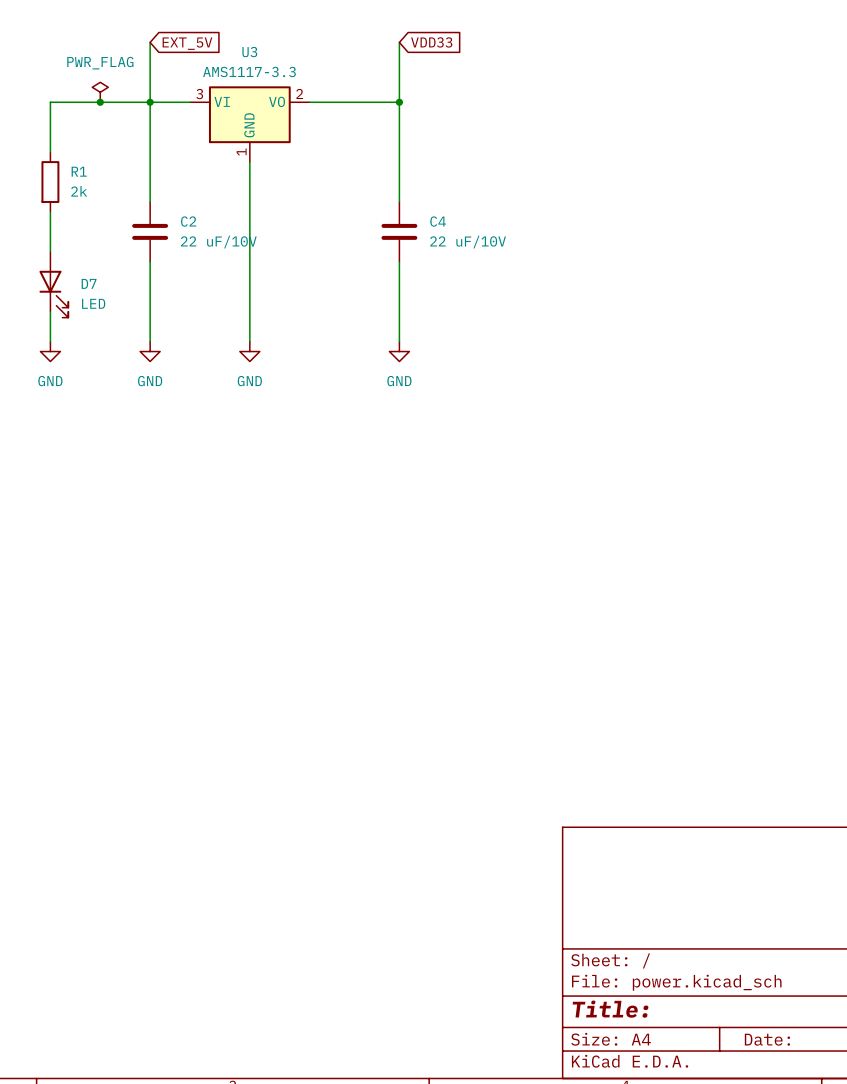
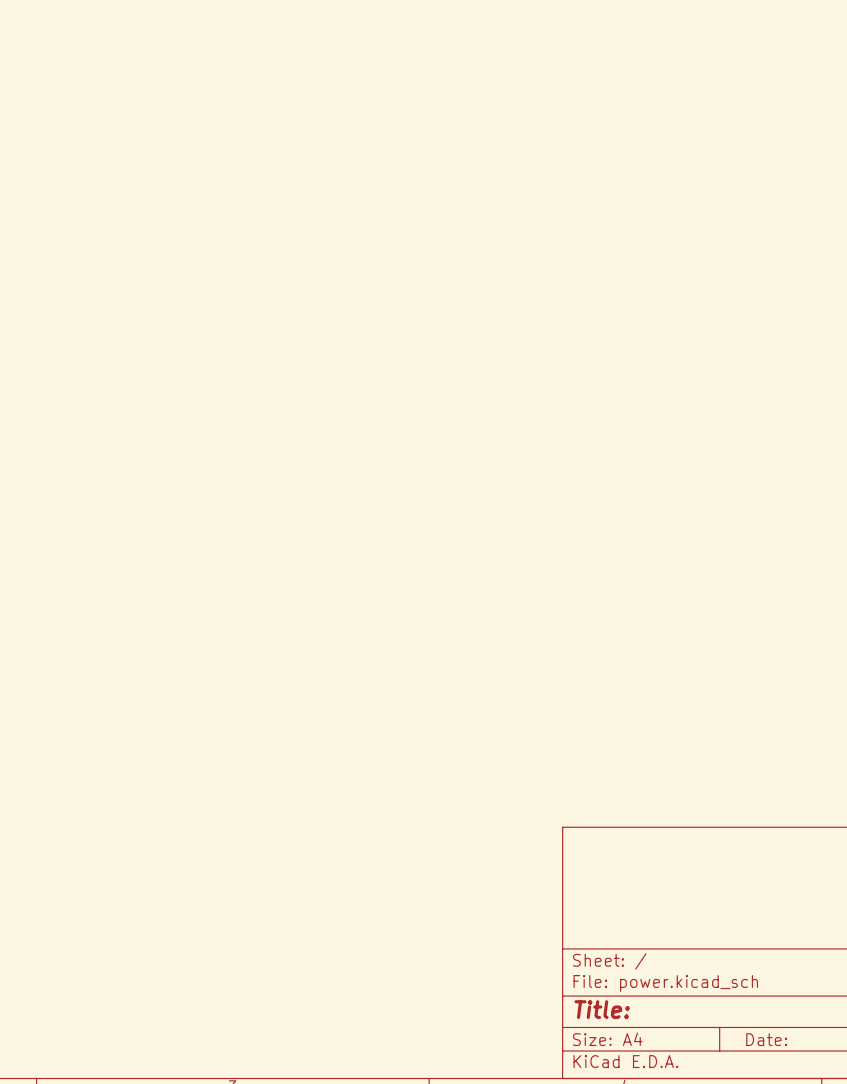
wire: (150, 42) (150, 201) -> none
wire: (399, 42) (399, 201) -> none
global label: VDD33 (431, 42) -> none
global label: EXT_5V (187, 43) -> none
power symbol: PWR_FLAG (100, 92) -> none
junction: (100, 102) -> none
junction: (150, 102) -> none
wire: (190, 102) (50, 102) (50, 152) -> none
wire: (309, 102) (399, 102) -> none
junction: (399, 102) -> none
U3: AMS1117-3.3 (249, 124) -> none
wire: (249, 162) (249, 341) -> none
R1: 2k (50, 182) -> none
wire: (50, 211) (50, 251) -> none
C2: 22 uF/10V (150, 231) -> none
C4: 22 uF/10V (399, 231) -> none
wire: (150, 261) (150, 341) -> none
wire: (399, 261) (399, 341) -> none
D7: LED (53, 284) -> none
wire: (50, 311) (50, 341) -> none
power symbol: GND (50, 351) -> none
power symbol: GND (150, 351) -> none
power symbol: GND (249, 351) -> none
power symbol: GND (399, 351) -> none

